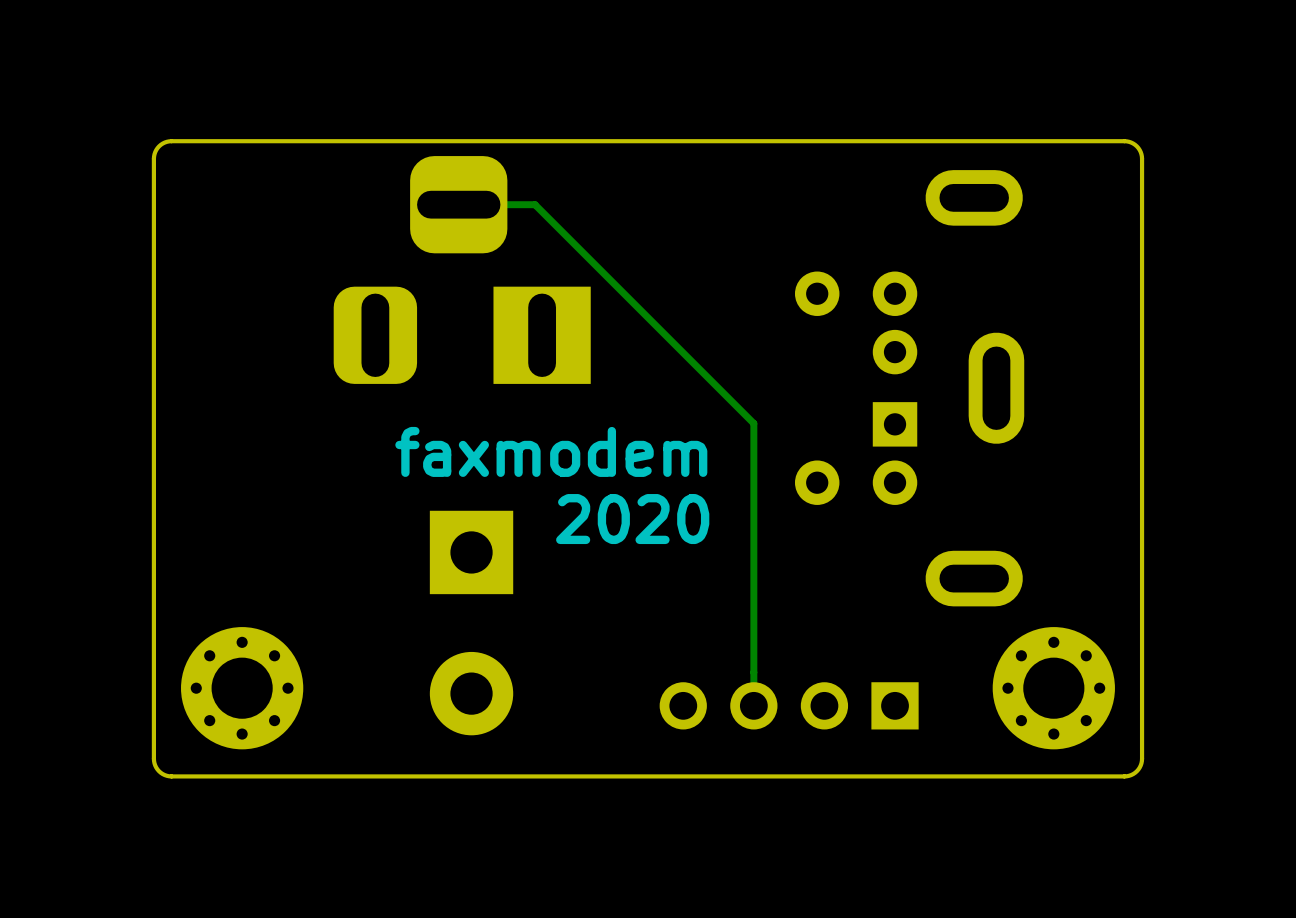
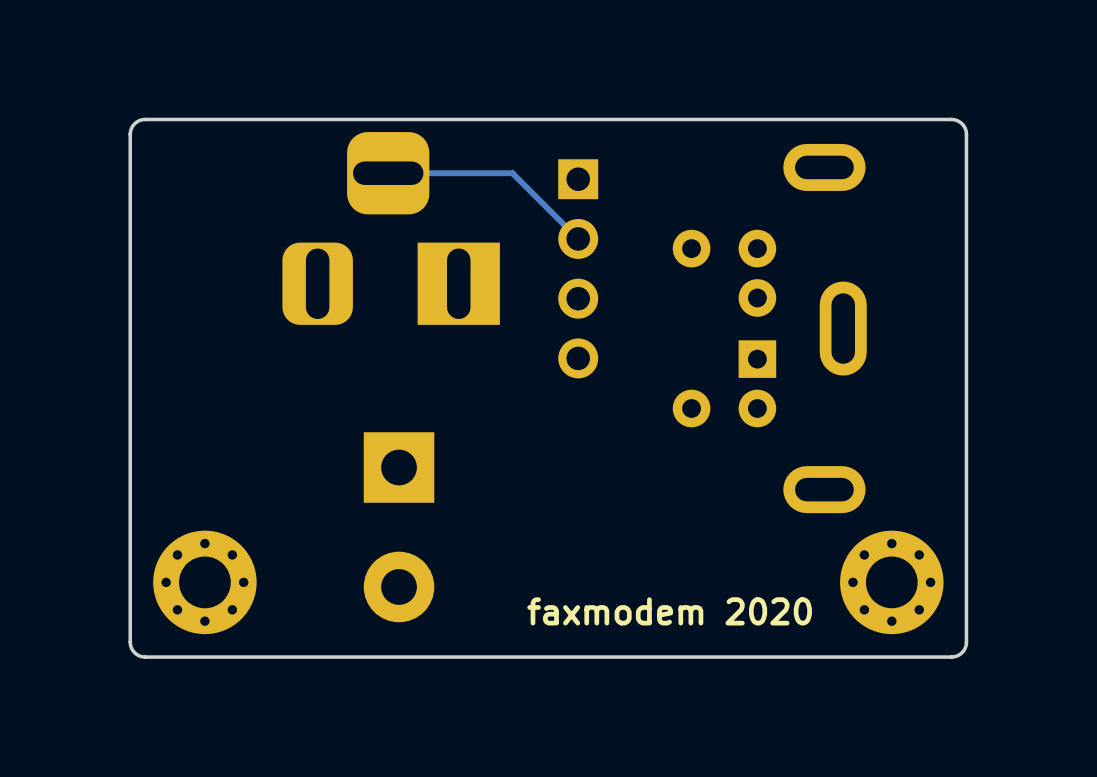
track: (535, 204) (753, 423) (753, 705) -> (452, 173) (512, 173) (578, 238)
text: faxmodem (551, 451) -> none
text: 2020 (632, 519) -> none
part rotation: 0° (789, 705) -> 90° counterclockwise (578, 268)
part position: (789, 705) -> (578, 268)
text: none -> faxmodem 2020 (669, 611)

